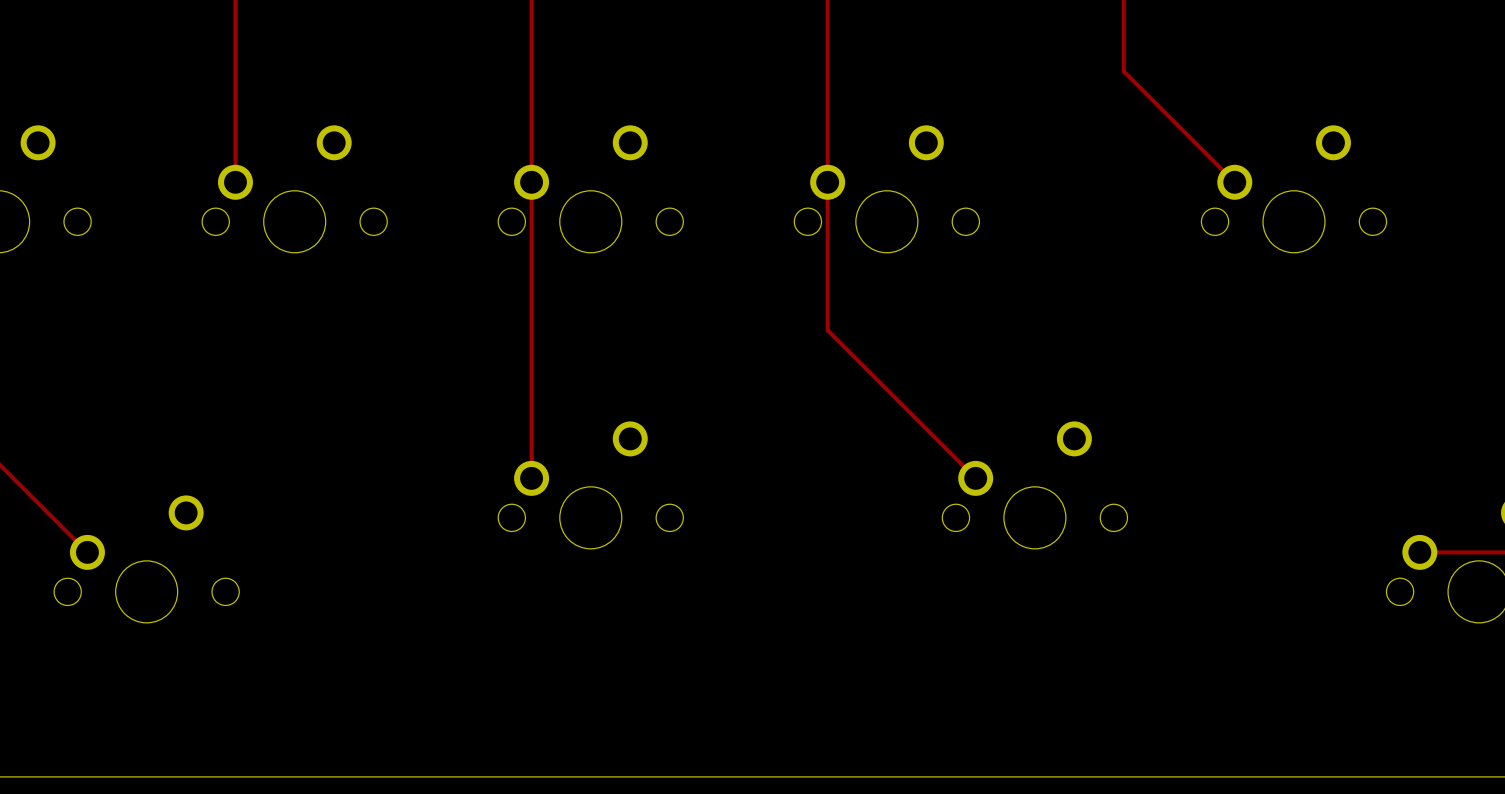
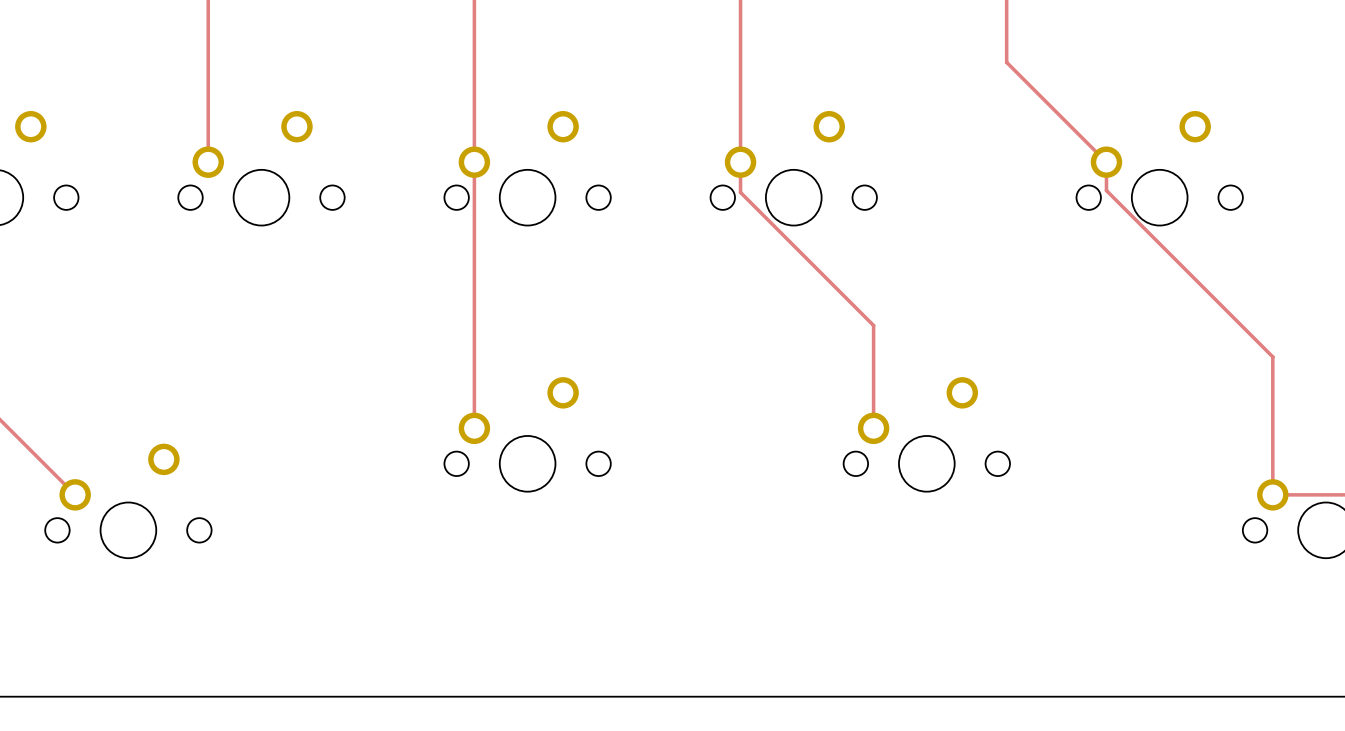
track: none -> (1106, 162) (1106, 190) (1272, 356) (1272, 494)
track: (827, 215) (827, 330) (975, 478) -> (740, 192) (873, 325) (873, 428)

